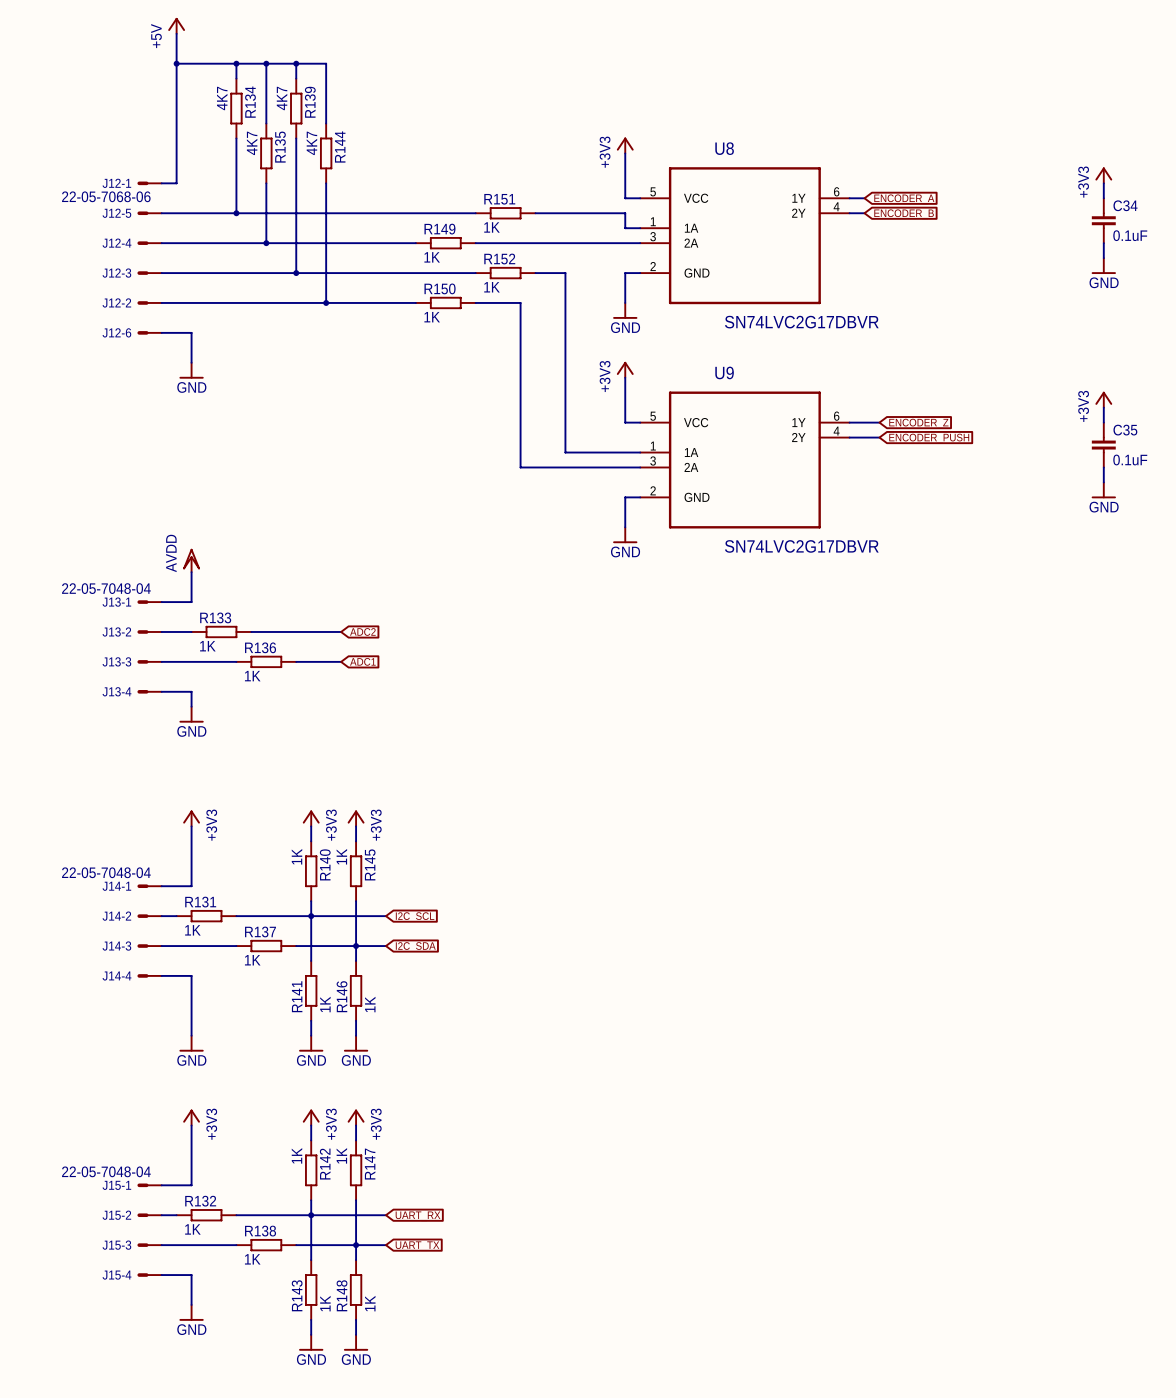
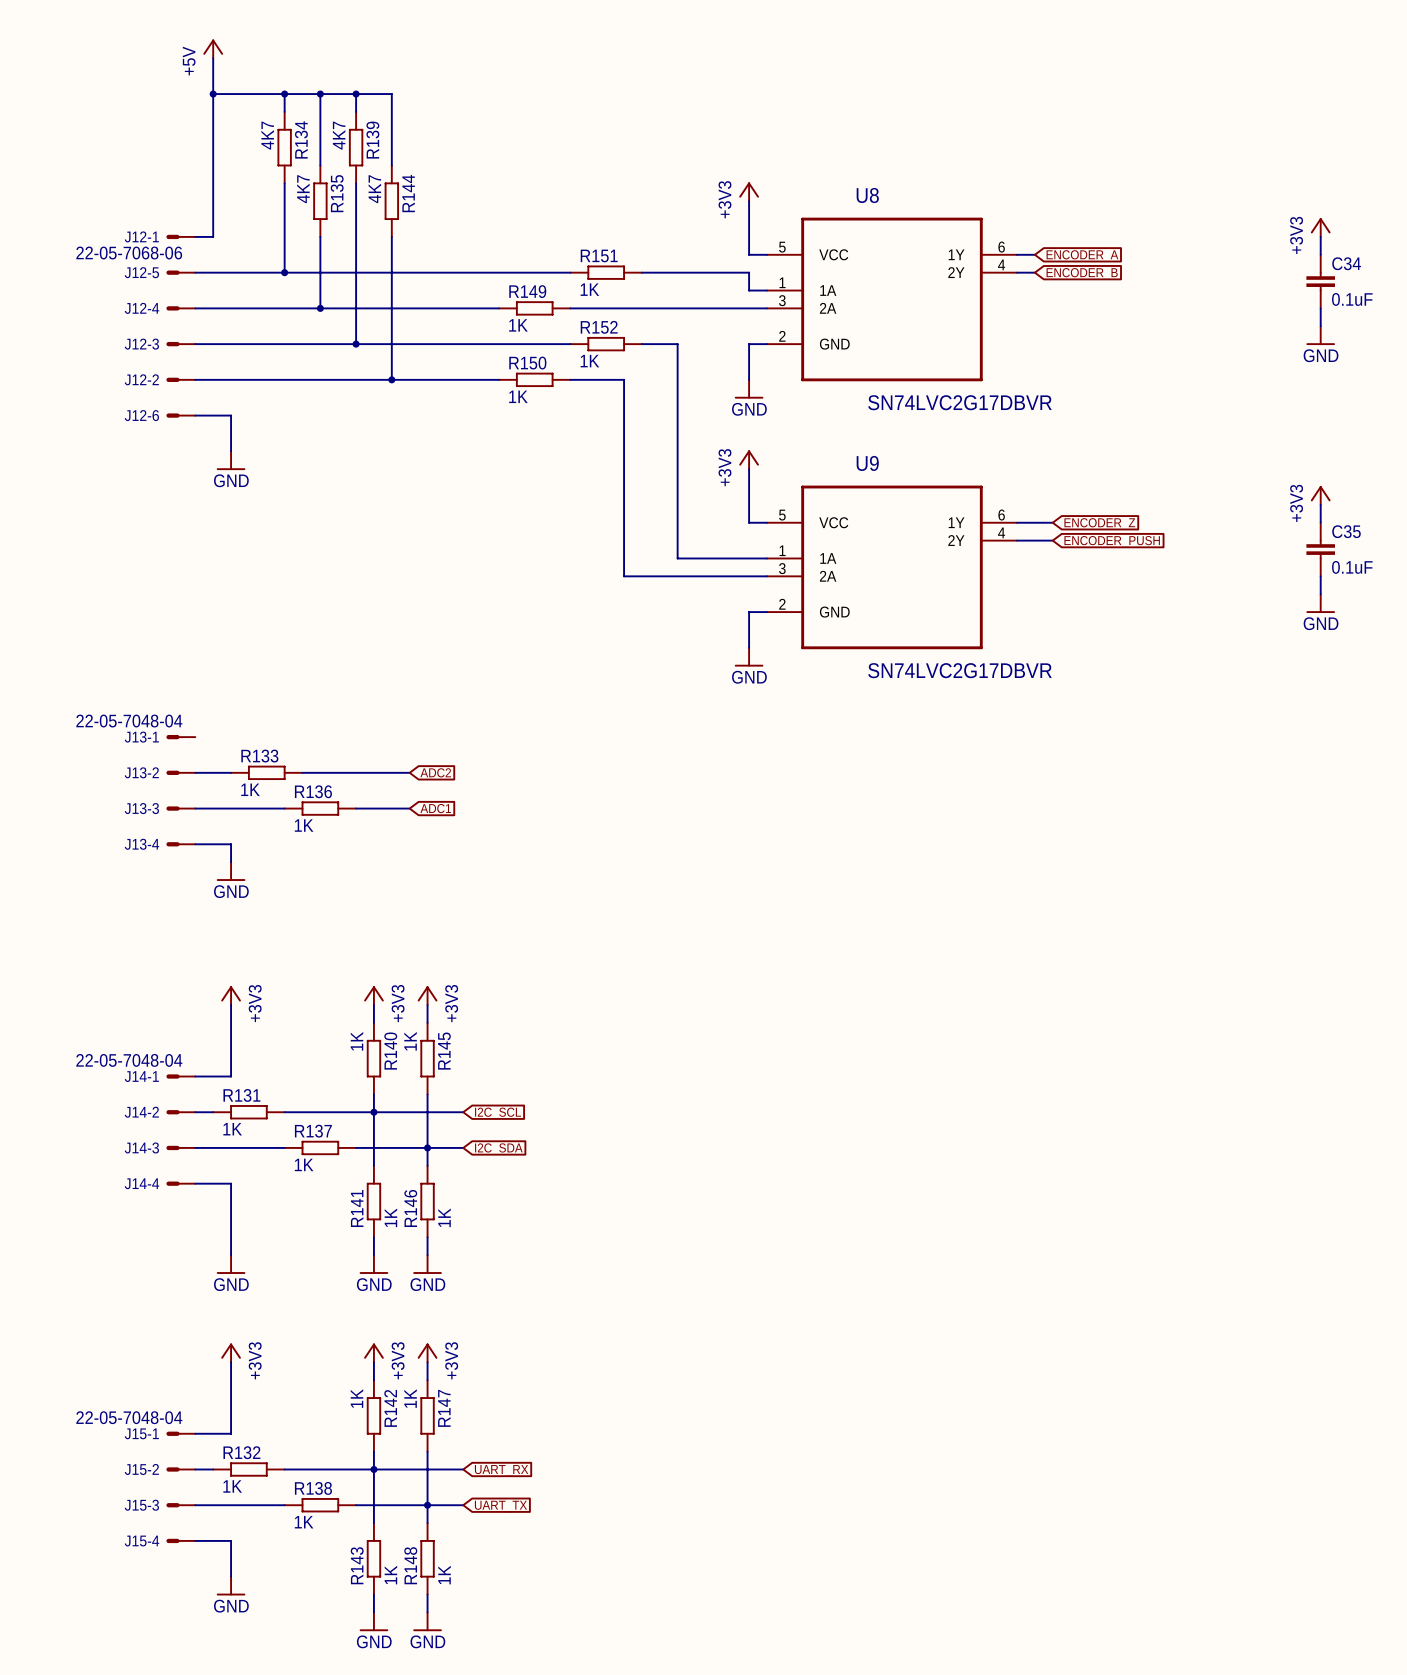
power symbol: AVDD (191, 560) -> none
wire: (191, 572) (191, 602) (161, 602) -> none

